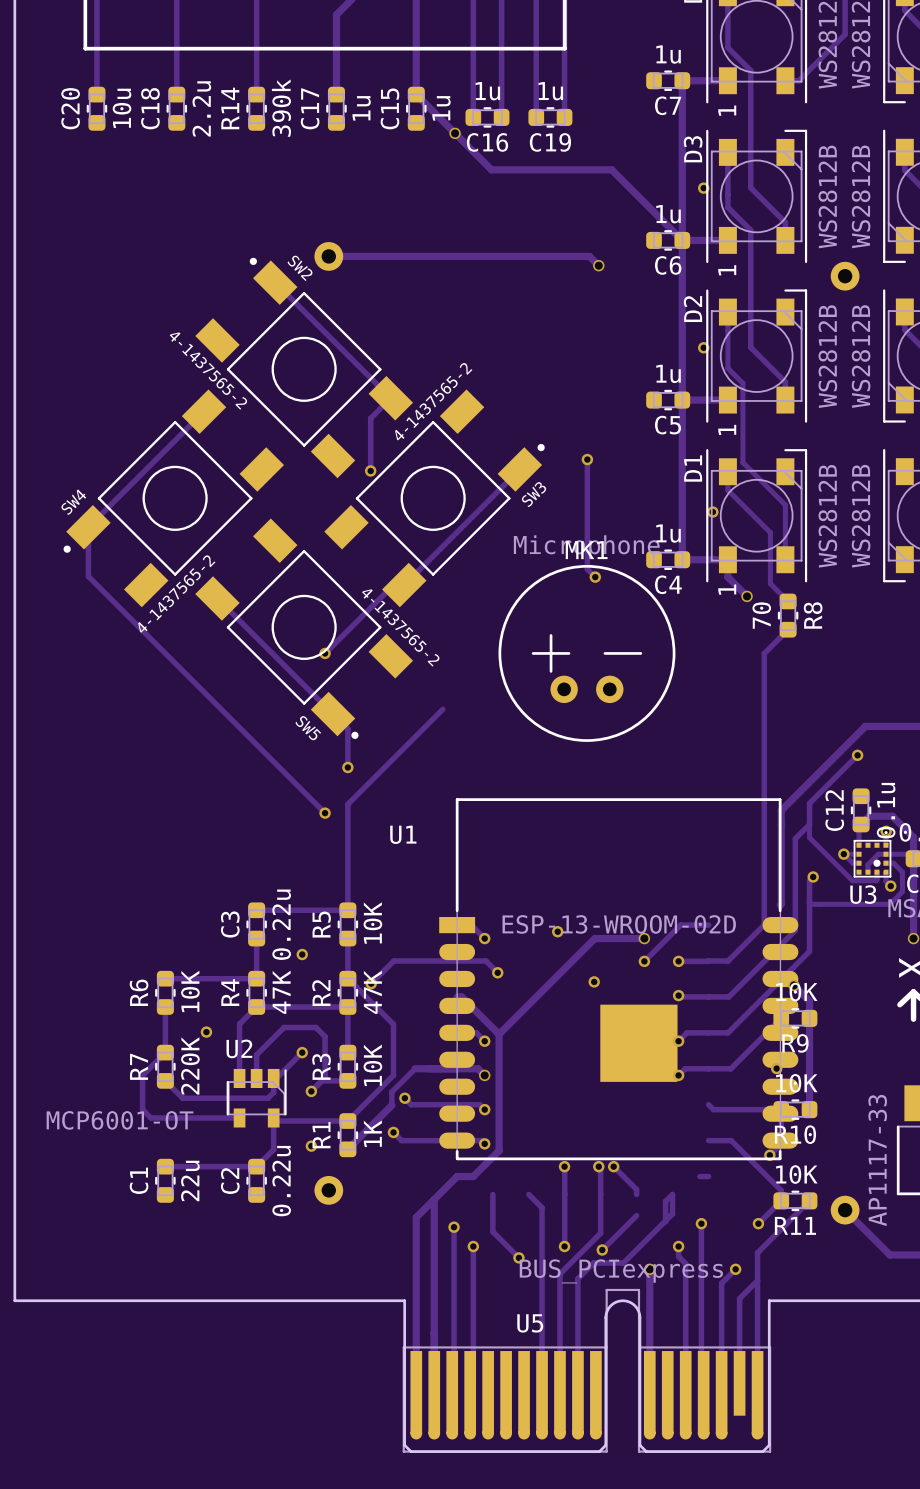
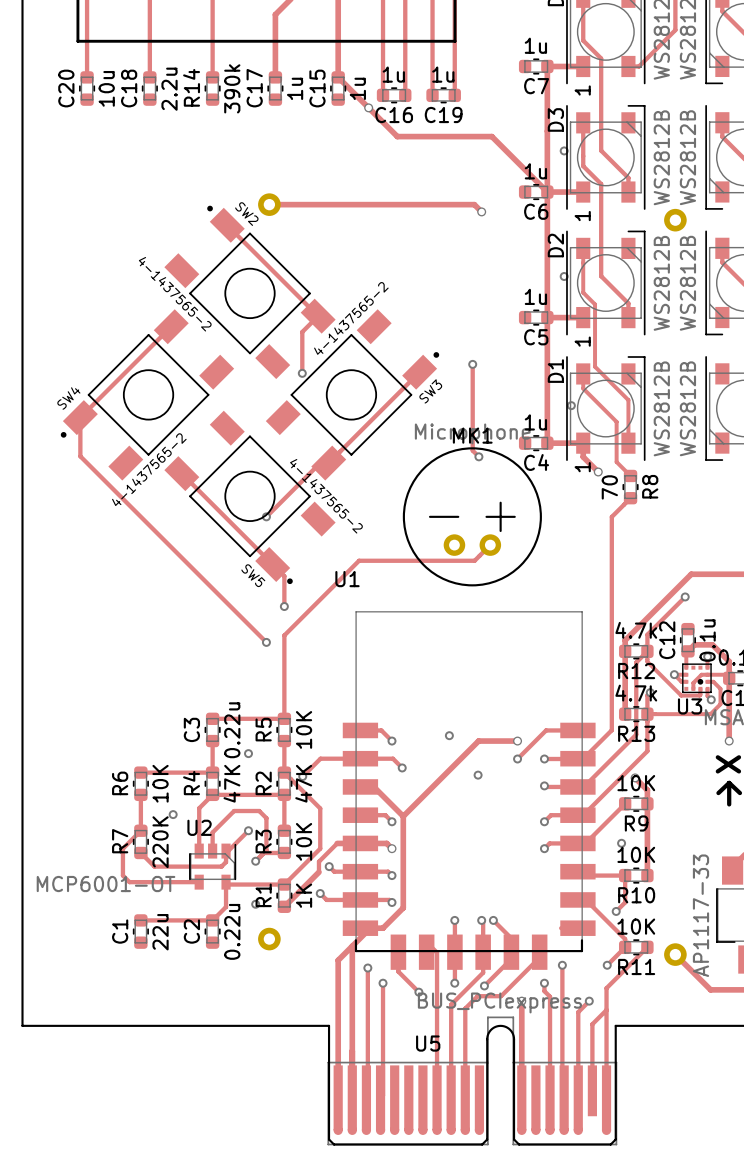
MK1 footprint: [498, 564, 676, 742] -> [402, 447, 542, 587]
track: none -> (490, 545) (474, 560) (359, 560)
U1 footprint: [439, 798, 799, 1161] -> [342, 611, 596, 970]
R12: none -> 4.7k (636, 651)
U1 name position: U1 (403, 834) -> U1 (347, 579)
R13: none -> 4.7k (636, 714)
U1 value: ESP-13-WROOM-02D (619, 924) -> none

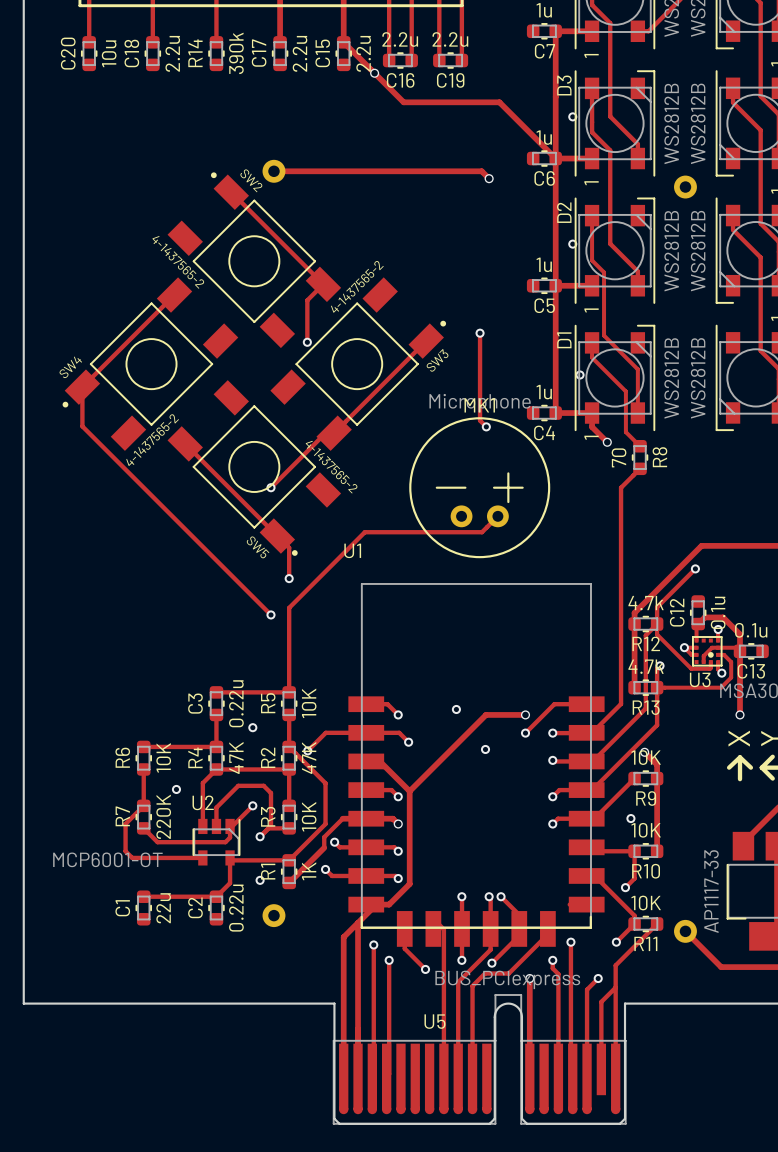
C16 value: 1u (393, 74) -> 2.2u (400, 39)
C19 value: 1u (443, 74) -> 2.2u (450, 39)
C17 value: 1u (295, 88) -> 2.2u (300, 53)
C15 value: 1u (357, 88) -> 2.2u (363, 53)

